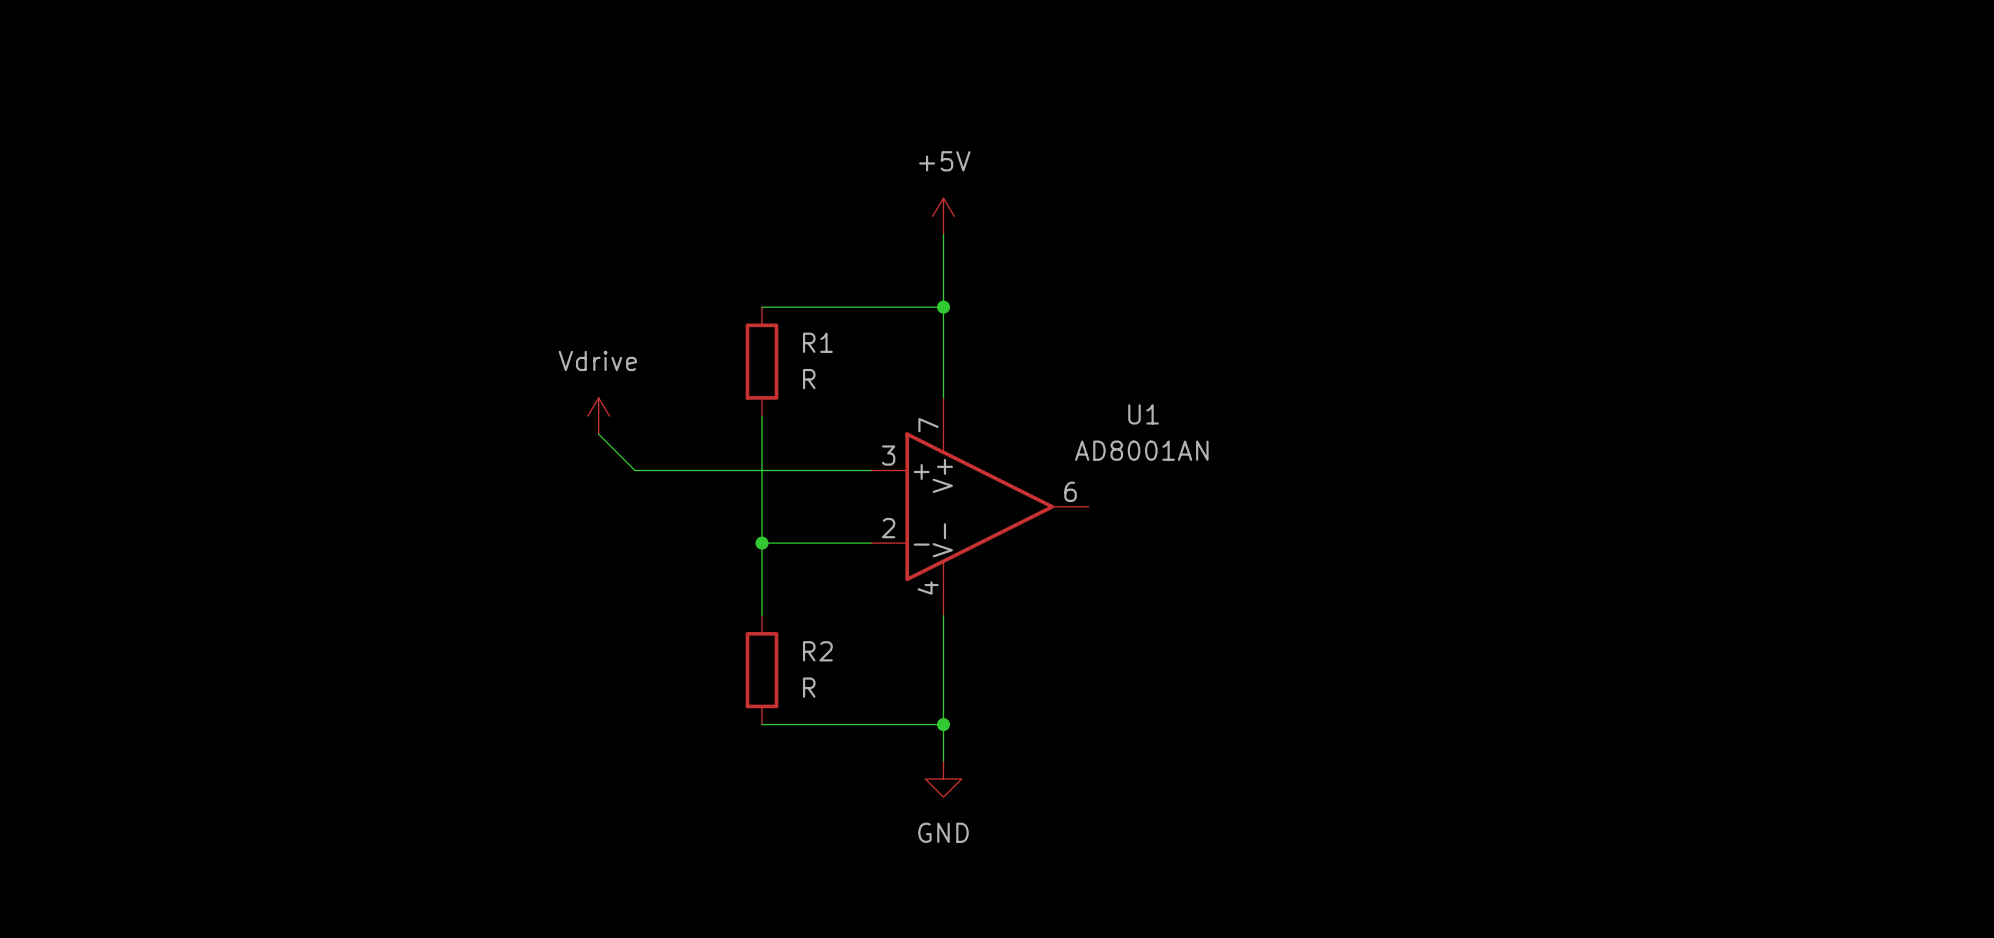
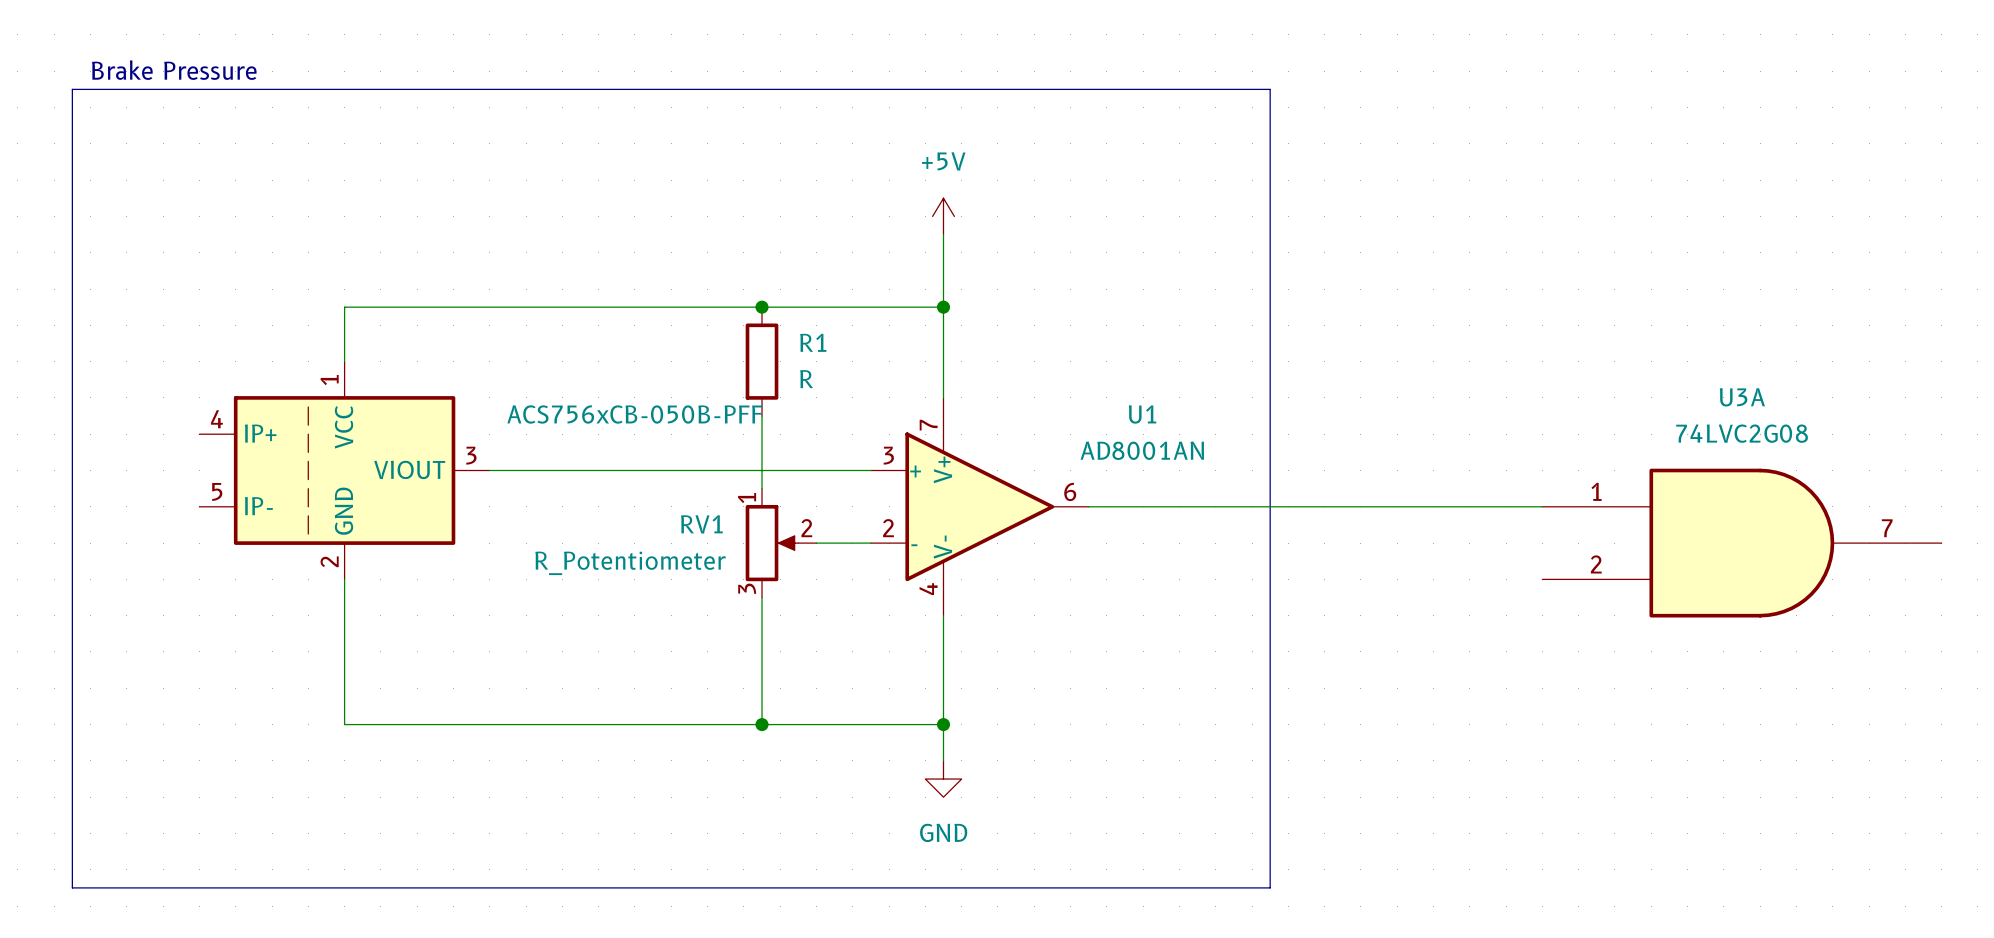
text: none -> Brake Pressure (174, 70)
line: none -> (72, 89) (1270, 89) (1270, 887) (72, 887) (72, 89)
wire: none -> (762, 307) (344, 307) (344, 361)
junction: none -> (762, 307)
power symbol: Vdrive (598, 416) -> none
wire: (598, 434) (634, 470) -> (489, 470) (634, 470)
part: none -> ACS756xCB-050B-PFF (344, 470)
wire: (762, 488) (762, 597) -> none
wire: none -> (1088, 506) (1542, 506)
junction: (762, 543) -> none
RV1: none -> R_Potentiometer (781, 543)
U3A: none -> 74LVC2G08 (1742, 543)
wire: none -> (344, 579) (344, 724) (762, 724) (762, 615)
R2: R (762, 670) -> none
junction: none -> (762, 724)

